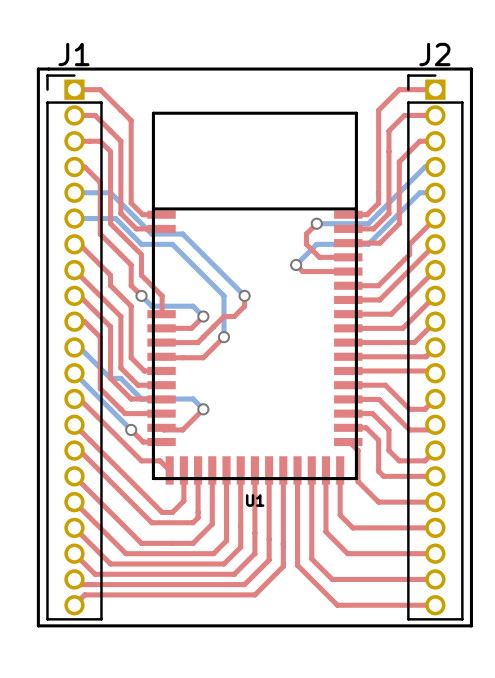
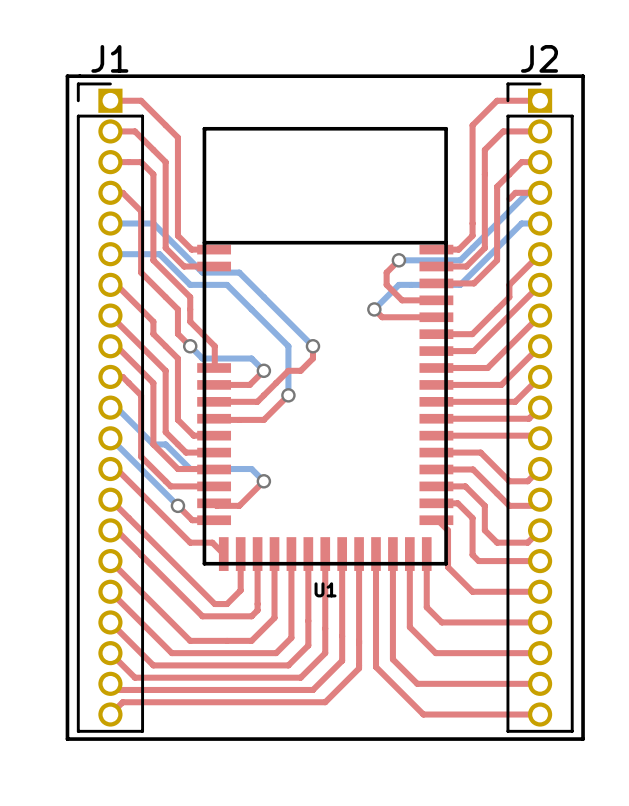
top track: none -> (540, 192) (515, 192) (509, 198)

